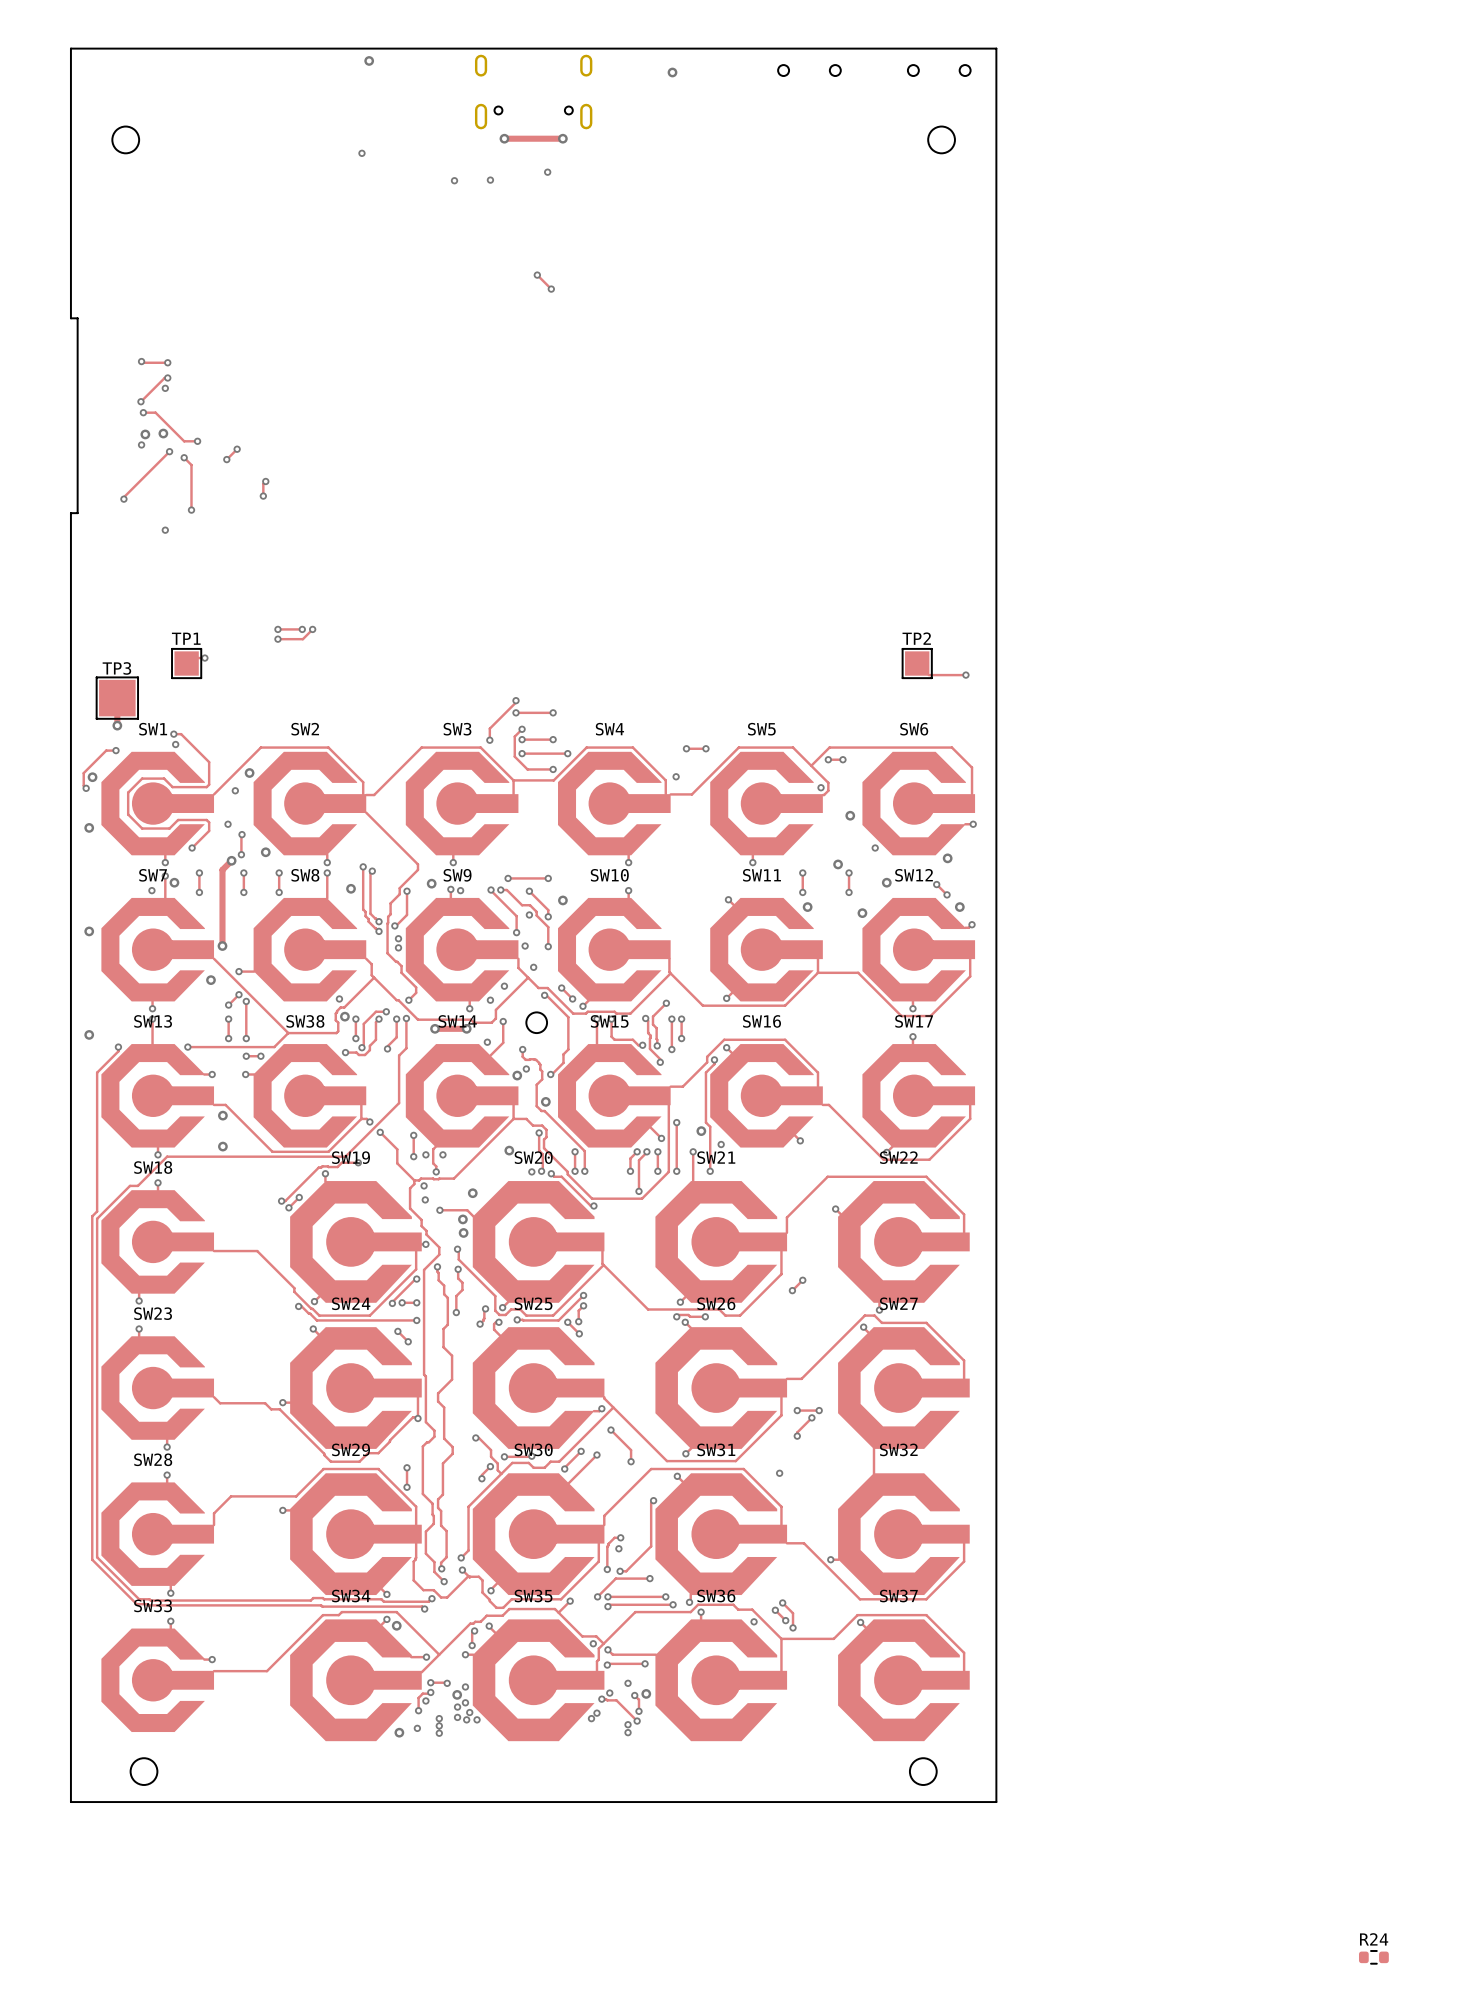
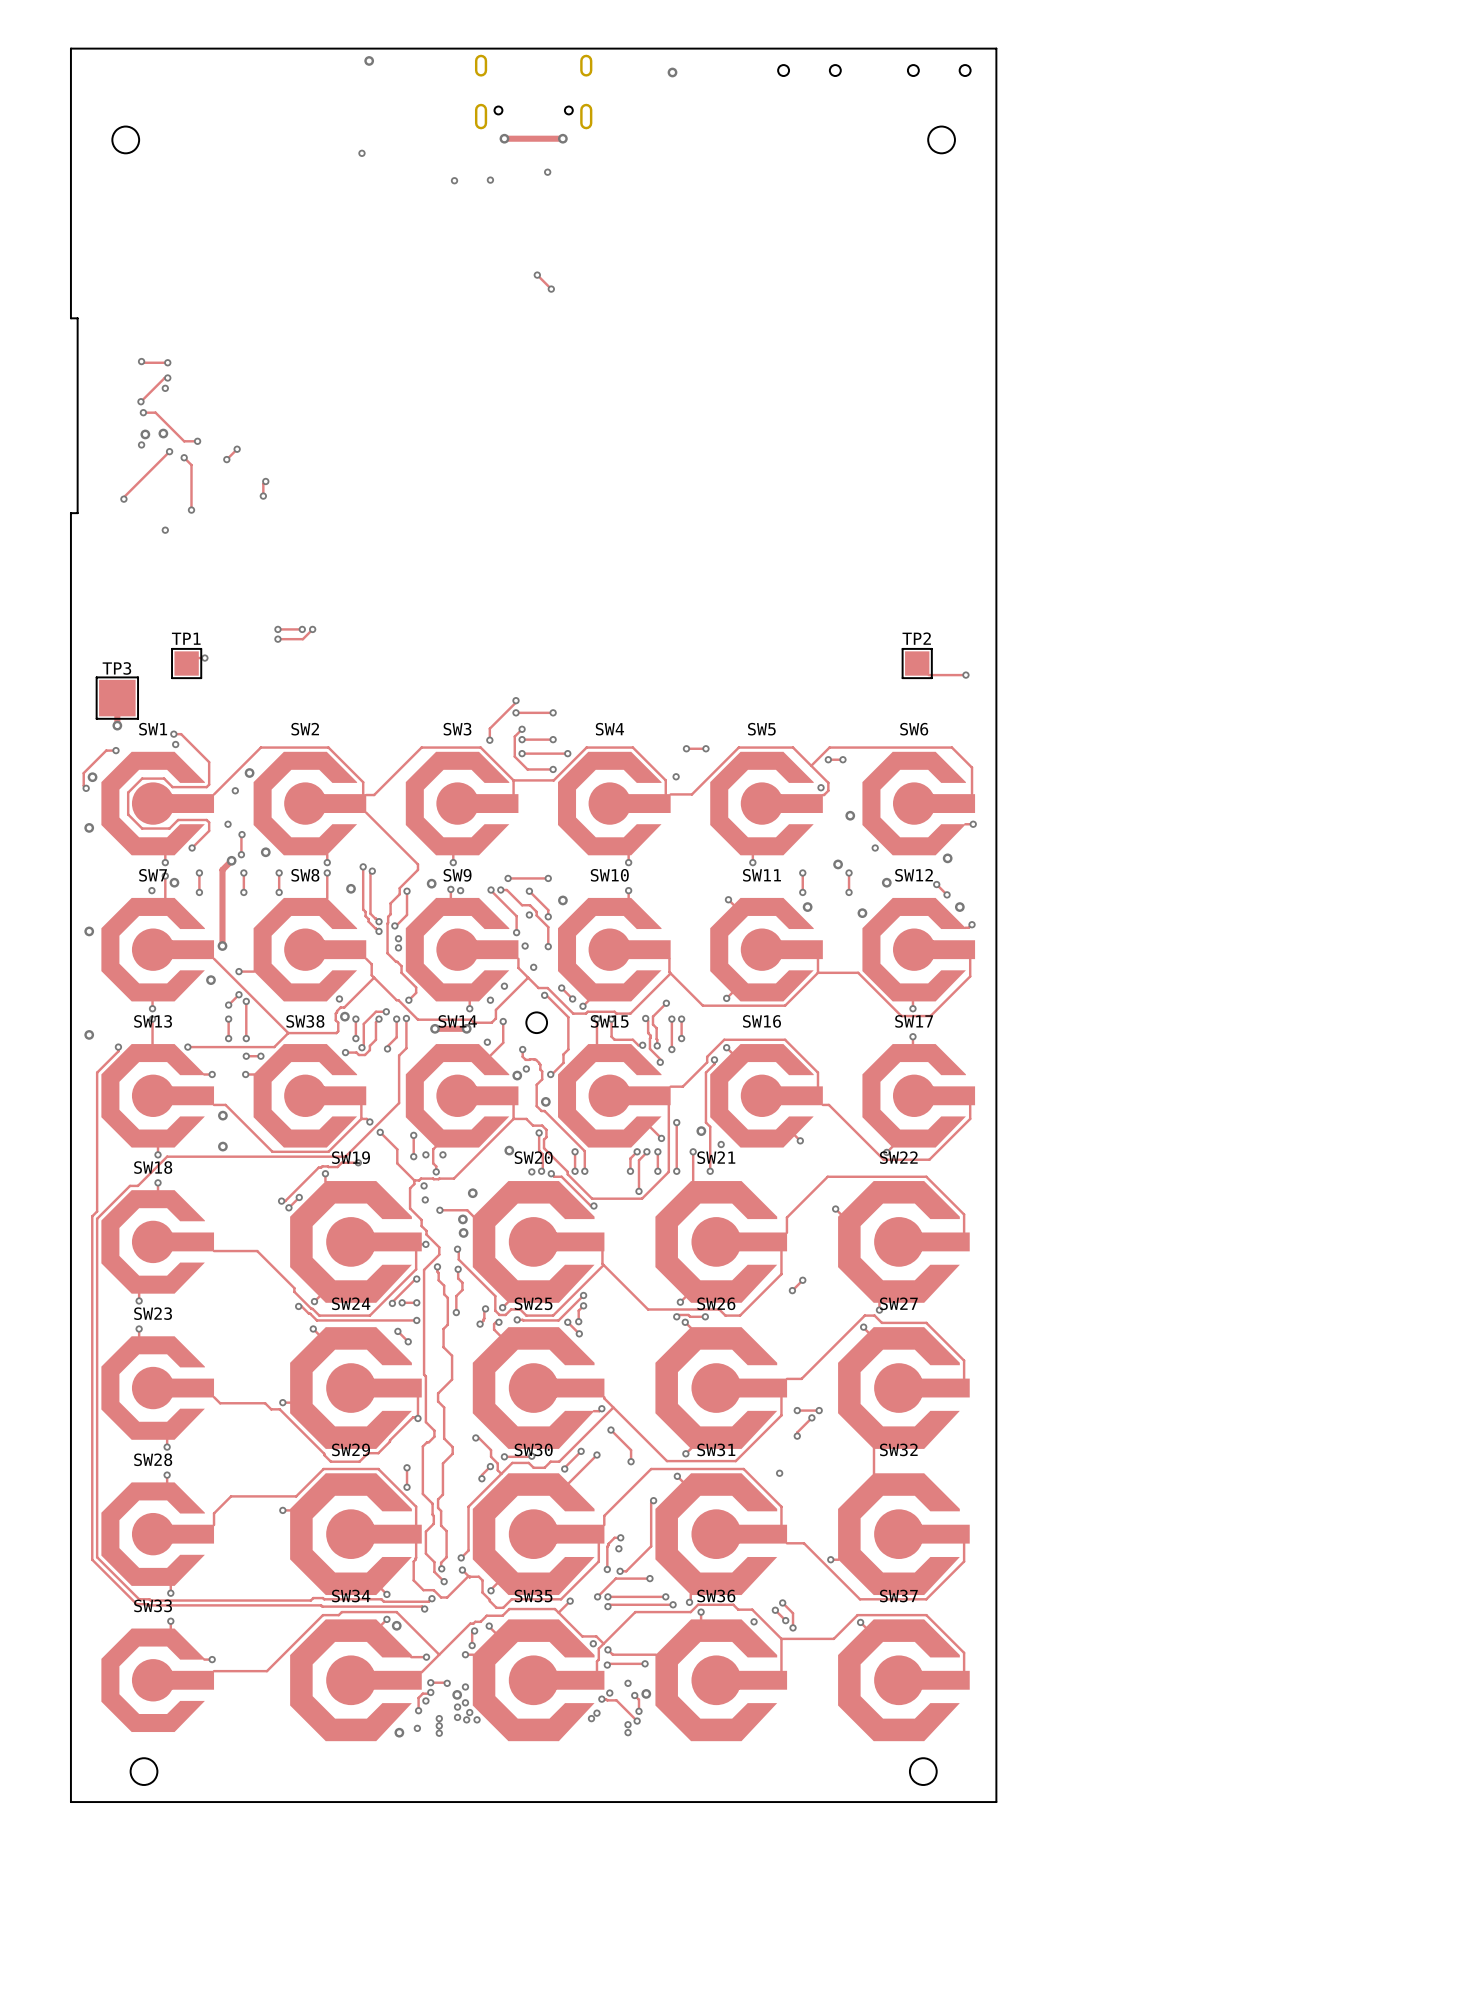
R24: (1373, 1957) -> none

